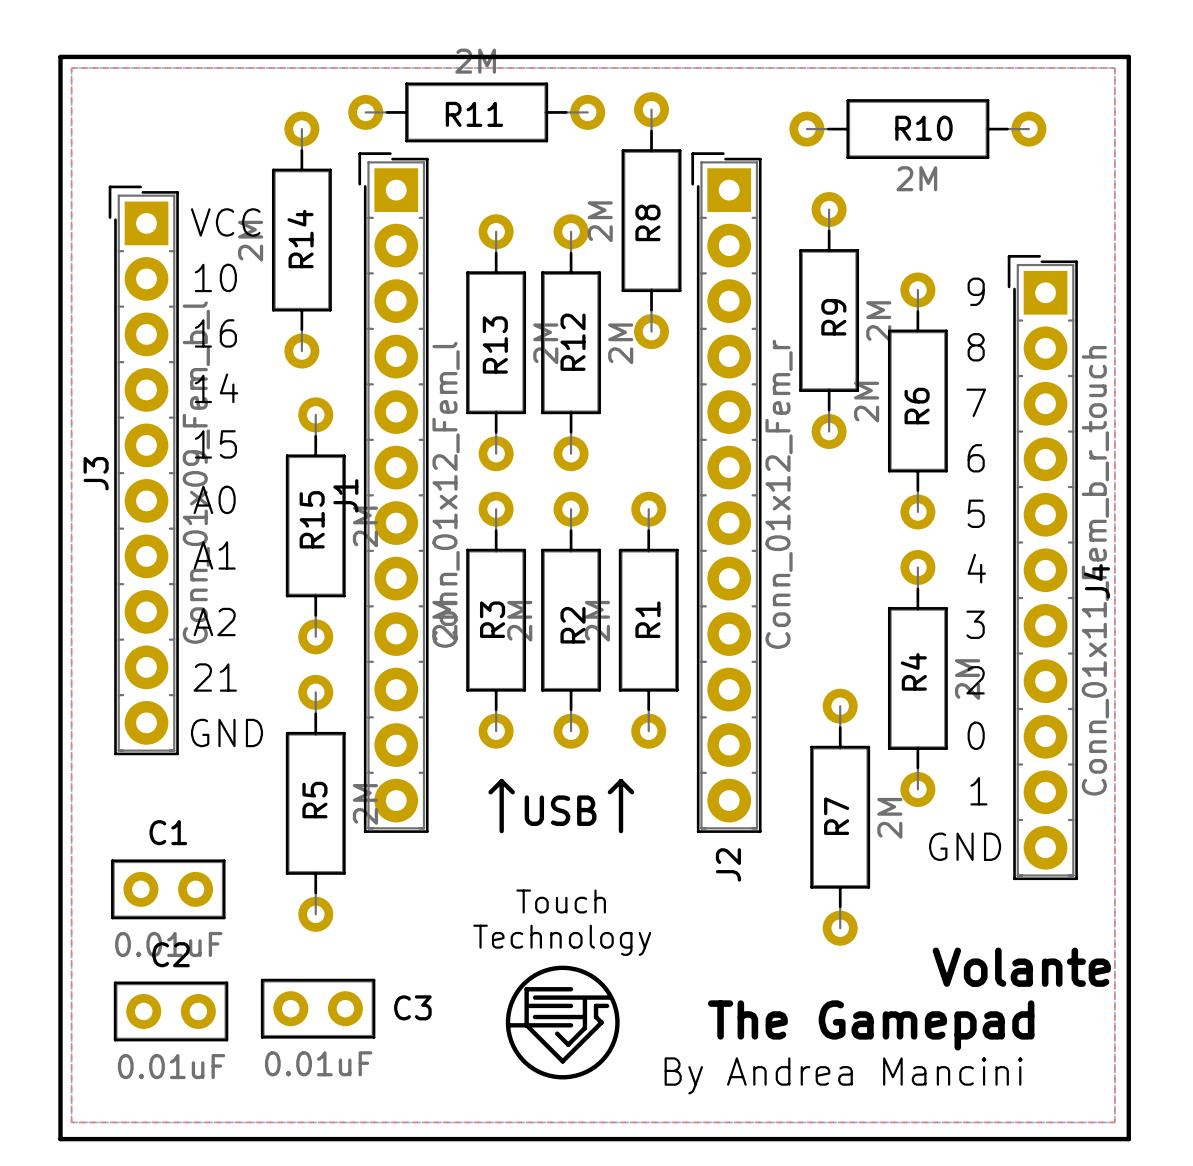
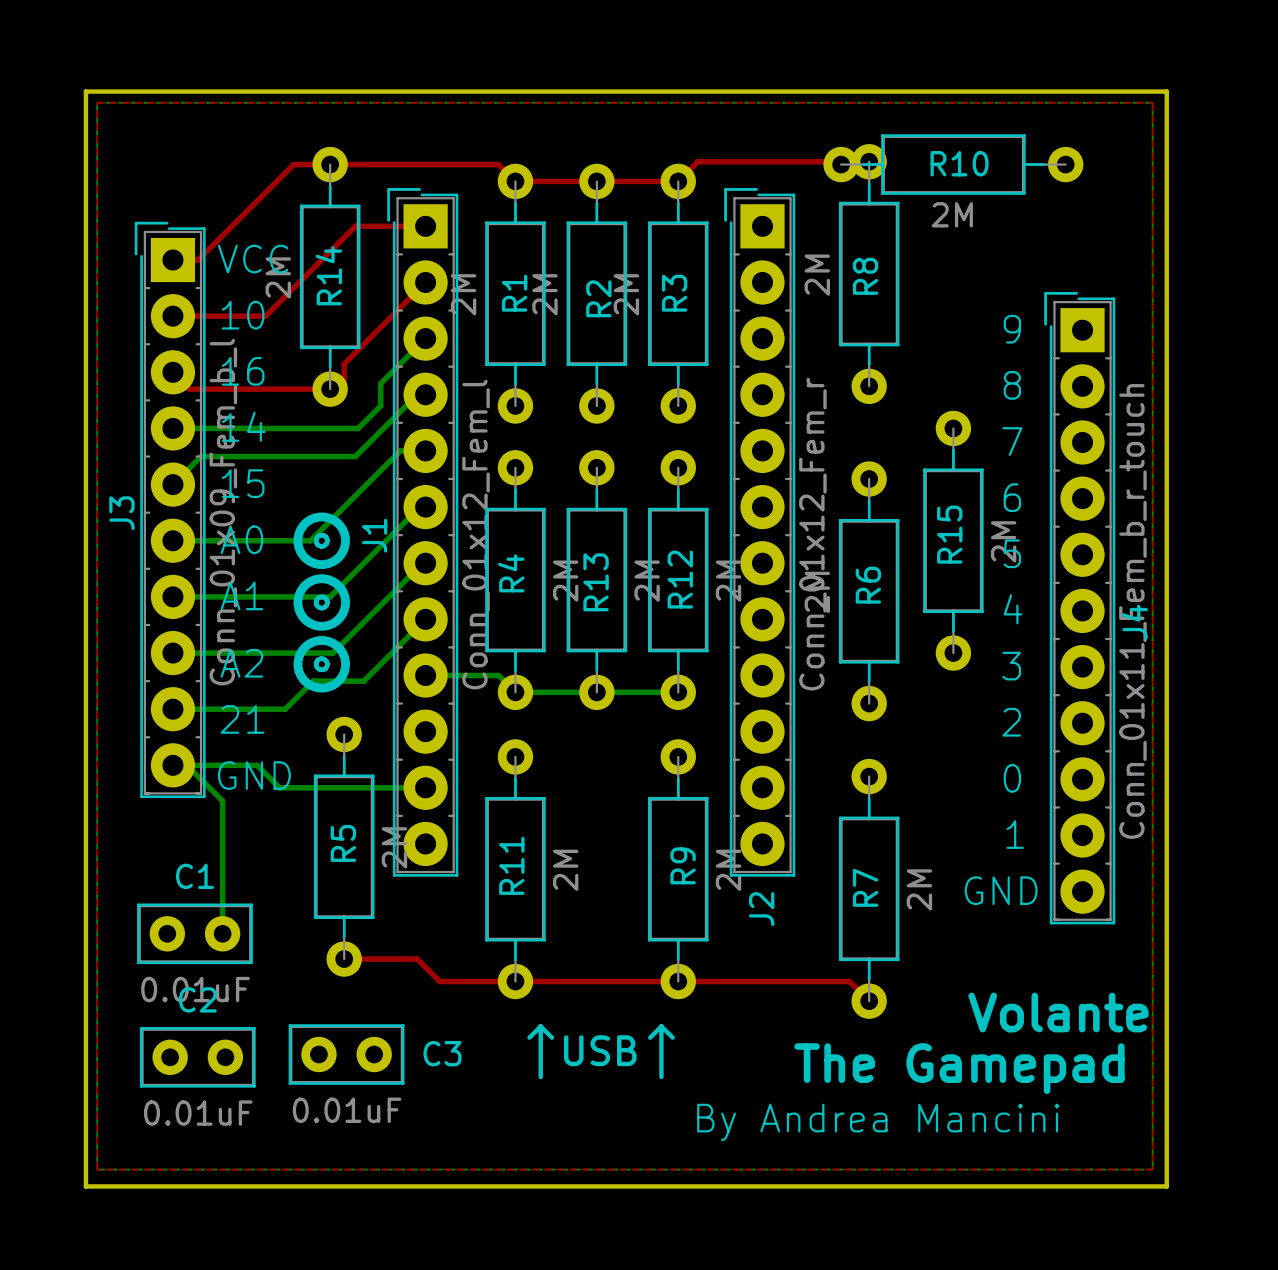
R11 rotation: 0° (476, 112) -> 90° clockwise (515, 869)
R11 position: (476, 112) -> (515, 869)
top track: none -> (869, 161) (697, 161) (678, 181) (515, 181) (498, 164) (293, 164) (198, 260) (172, 260)
top track: none -> (425, 226) (355, 226) (265, 316) (172, 316)
R8 position: (651, 220) -> (869, 274)
top track: none -> (425, 282) (344, 363) (344, 389) (189, 389) (172, 372)
bottom track: none -> (425, 338) (380, 383) (380, 406) (358, 428) (172, 428)
R9 position: (829, 320) -> (678, 869)
R13 position: (496, 342) -> (596, 580)
R12 position: (571, 342) -> (678, 580)
bottom track: none -> (417, 394) (355, 456) (201, 456) (172, 484)
R6 position: (917, 401) -> (869, 591)
R6 name position: R6 (917, 406) -> R6 (868, 585)
bottom track: none -> (425, 450) (400, 450) (310, 540) (172, 540)
bottom track: none -> (420, 507) (330, 596) (172, 596)
drawing: none -> [293, 512, 350, 693]
bottom track: none -> (422, 563) (332, 653) (172, 653)
R15 position: (315, 525) -> (953, 540)
bottom track: none -> (425, 619) (363, 681) (313, 681) (285, 709) (172, 709)
R3 position: (496, 620) -> (678, 293)
R2 position: (571, 620) -> (596, 293)
R1 position: (648, 620) -> (515, 293)
bottom track: none -> (425, 675) (498, 675) (515, 692) (678, 692)
R4 position: (917, 678) -> (515, 580)
bottom track: none -> (172, 765) (257, 765) (279, 787) (425, 787)
bottom track: none -> (186, 765) (222, 800) (222, 933)
line: (501, 781) (512, 792) -> (540, 1026) (551, 1037)
line: (501, 781) (490, 792) -> (540, 1026) (529, 1037)
line: (501, 781) (501, 831) -> (540, 1026) (540, 1076)
line: (620, 781) (632, 792) -> (661, 1026) (672, 1037)
line: (620, 781) (609, 792) -> (661, 1026) (650, 1037)
line: (620, 781) (620, 831) -> (661, 1026) (661, 1076)
text position: USB (560, 810) -> USB (600, 1050)
R7 position: (840, 817) -> (869, 888)
text: Touch (561, 901) -> none
top track: none -> (344, 959) (417, 959) (439, 981) (849, 981) (869, 1001)
text: Technology (562, 940) -> none
drawing: [505, 965, 620, 1080] -> none
line: (571, 989) (526, 989) (526, 1025) (562, 1061) (601, 1022) (596, 1017) (596, 1005) (607, 1005) -> none
line: (534, 997) (609, 997) -> none
line: (584, 1000) (584, 1028) (568, 1044) (557, 1033) -> none
line: (529, 1005) (571, 1005) -> none
line: (534, 1017) (584, 1017) -> none
line: (510, 1025) (571, 1025) -> none
text position: The Gamepad (871, 1025) -> The Gamepad (959, 1068)

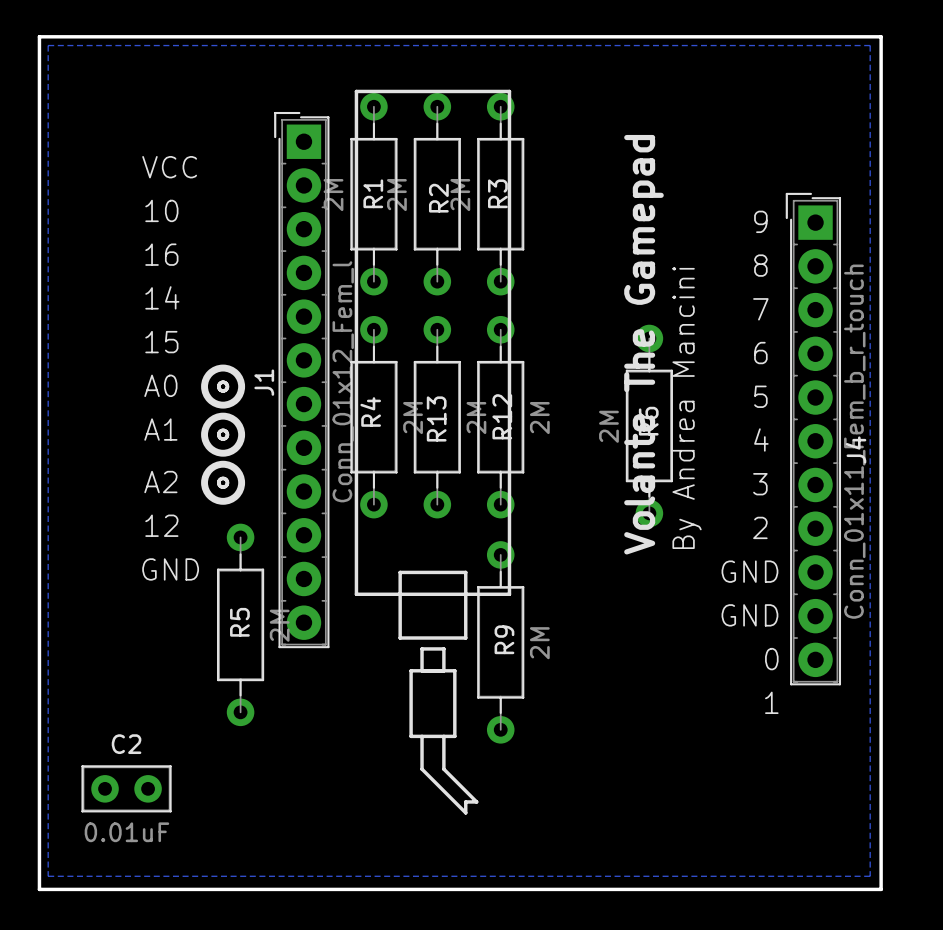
top zone outline: (97, 102) (1152, 102) (1152, 1169) (97, 1169) (97, 102) -> none
line: none -> (356, 91) (356, 594) (509, 594) (509, 91) (356, 91)
top track: (869, 161) (697, 161) (678, 181) (515, 181) (498, 164) (293, 164) (198, 260) (172, 260) -> none
R10: 2M (953, 164) -> none
top track: (425, 226) (355, 226) (265, 316) (172, 316) -> none
R8: 2M (869, 274) -> none
R14: 2M (330, 276) -> none
top track: (425, 282) (344, 363) (344, 389) (189, 389) (172, 372) -> none
bottom track: (425, 338) (380, 383) (380, 406) (358, 428) (172, 428) -> none
bottom track: (425, 394) (417, 394) (355, 456) (201, 456) (172, 484) -> none
bottom track: (425, 450) (400, 450) (310, 540) (172, 540) -> none
text: none -> Volante The Gamepad (643, 344)
bottom track: (425, 507) (420, 507) (330, 596) (172, 596) -> none
J3: Conn_01x09_Fem_b_l (170, 509) -> none
J2: Conn_01x12_Fem_r (759, 532) -> none
R15: 2M (953, 540) -> none
bottom track: (425, 563) (422, 563) (332, 653) (172, 653) -> none
bottom track: (425, 619) (363, 681) (313, 681) (285, 709) (172, 709) -> none
bottom track: (425, 675) (498, 675) (515, 692) (678, 692) -> none
text: 21 (242, 719) -> 12 (161, 525)
bottom track: (172, 765) (257, 765) (279, 787) (425, 787) -> none
bottom track: (186, 765) (222, 800) (222, 933) -> none
text: none -> GND (749, 571)
text position: 0 (1012, 778) -> 0 (771, 659)
line: none -> (400, 572) (465, 572) (465, 638) (400, 638) (400, 572)
text: none -> GND (749, 615)
text position: 1 (1015, 834) -> 1 (771, 702)
R11: 2M (515, 869) -> none
R7: 2M (869, 888) -> none
text: GND (1001, 890) -> none
line: none -> (411, 670) (411, 736) (454, 736) (454, 670) (411, 670)
line: none -> (422, 670) (422, 648) (443, 648) (443, 670)
C1: 0.01uF (194, 933) -> none
top track: (344, 959) (417, 959) (439, 981) (849, 981) (869, 1001) -> none
line: none -> (422, 736) (422, 769) (465, 812) (465, 801) (476, 801) (443, 769) (443, 736)
text: Volante (1058, 1012) -> none
line: (540, 1026) (551, 1037) -> none
line: (540, 1026) (529, 1037) -> none
line: (540, 1026) (540, 1076) -> none
line: (661, 1026) (672, 1037) -> none
line: (661, 1026) (650, 1037) -> none
line: (661, 1026) (661, 1076) -> none
text: USB (600, 1050) -> none
C3: 0.01uF (346, 1054) -> none
text: The Gamepad (959, 1068) -> none
text rotation: 0° (878, 1122) -> 90° counterclockwise (687, 407)
text position: By Andrea Mancini (878, 1122) -> By Andrea Mancini (687, 407)

